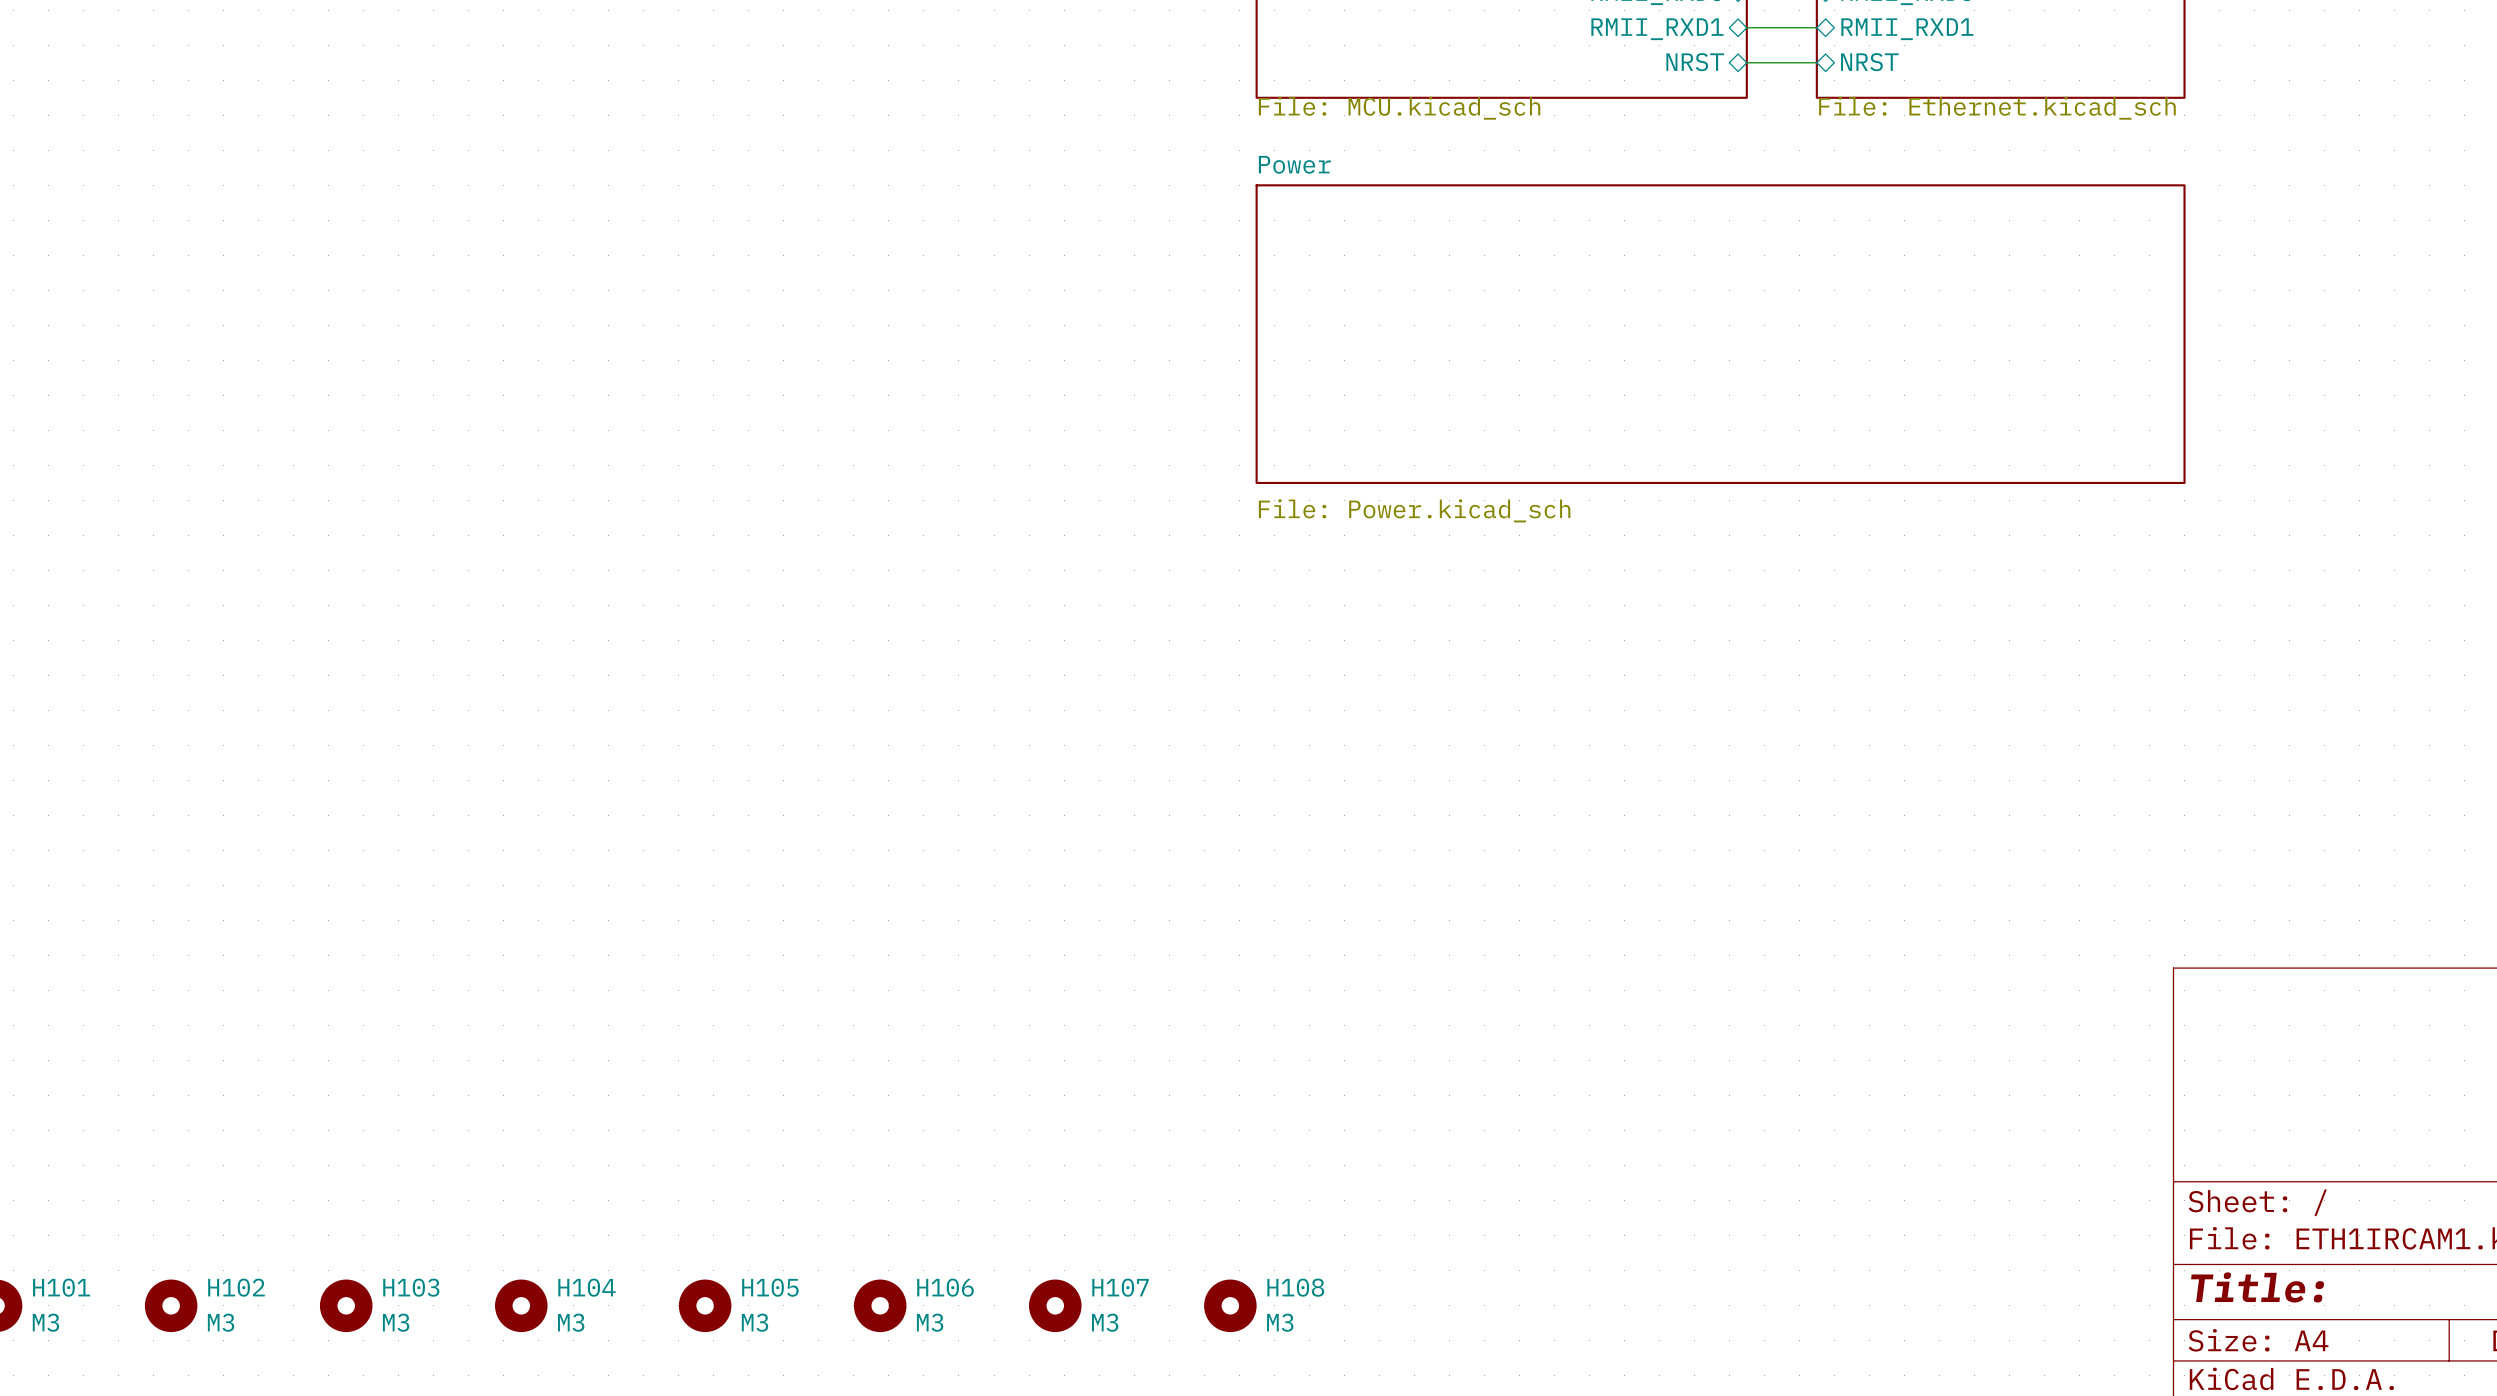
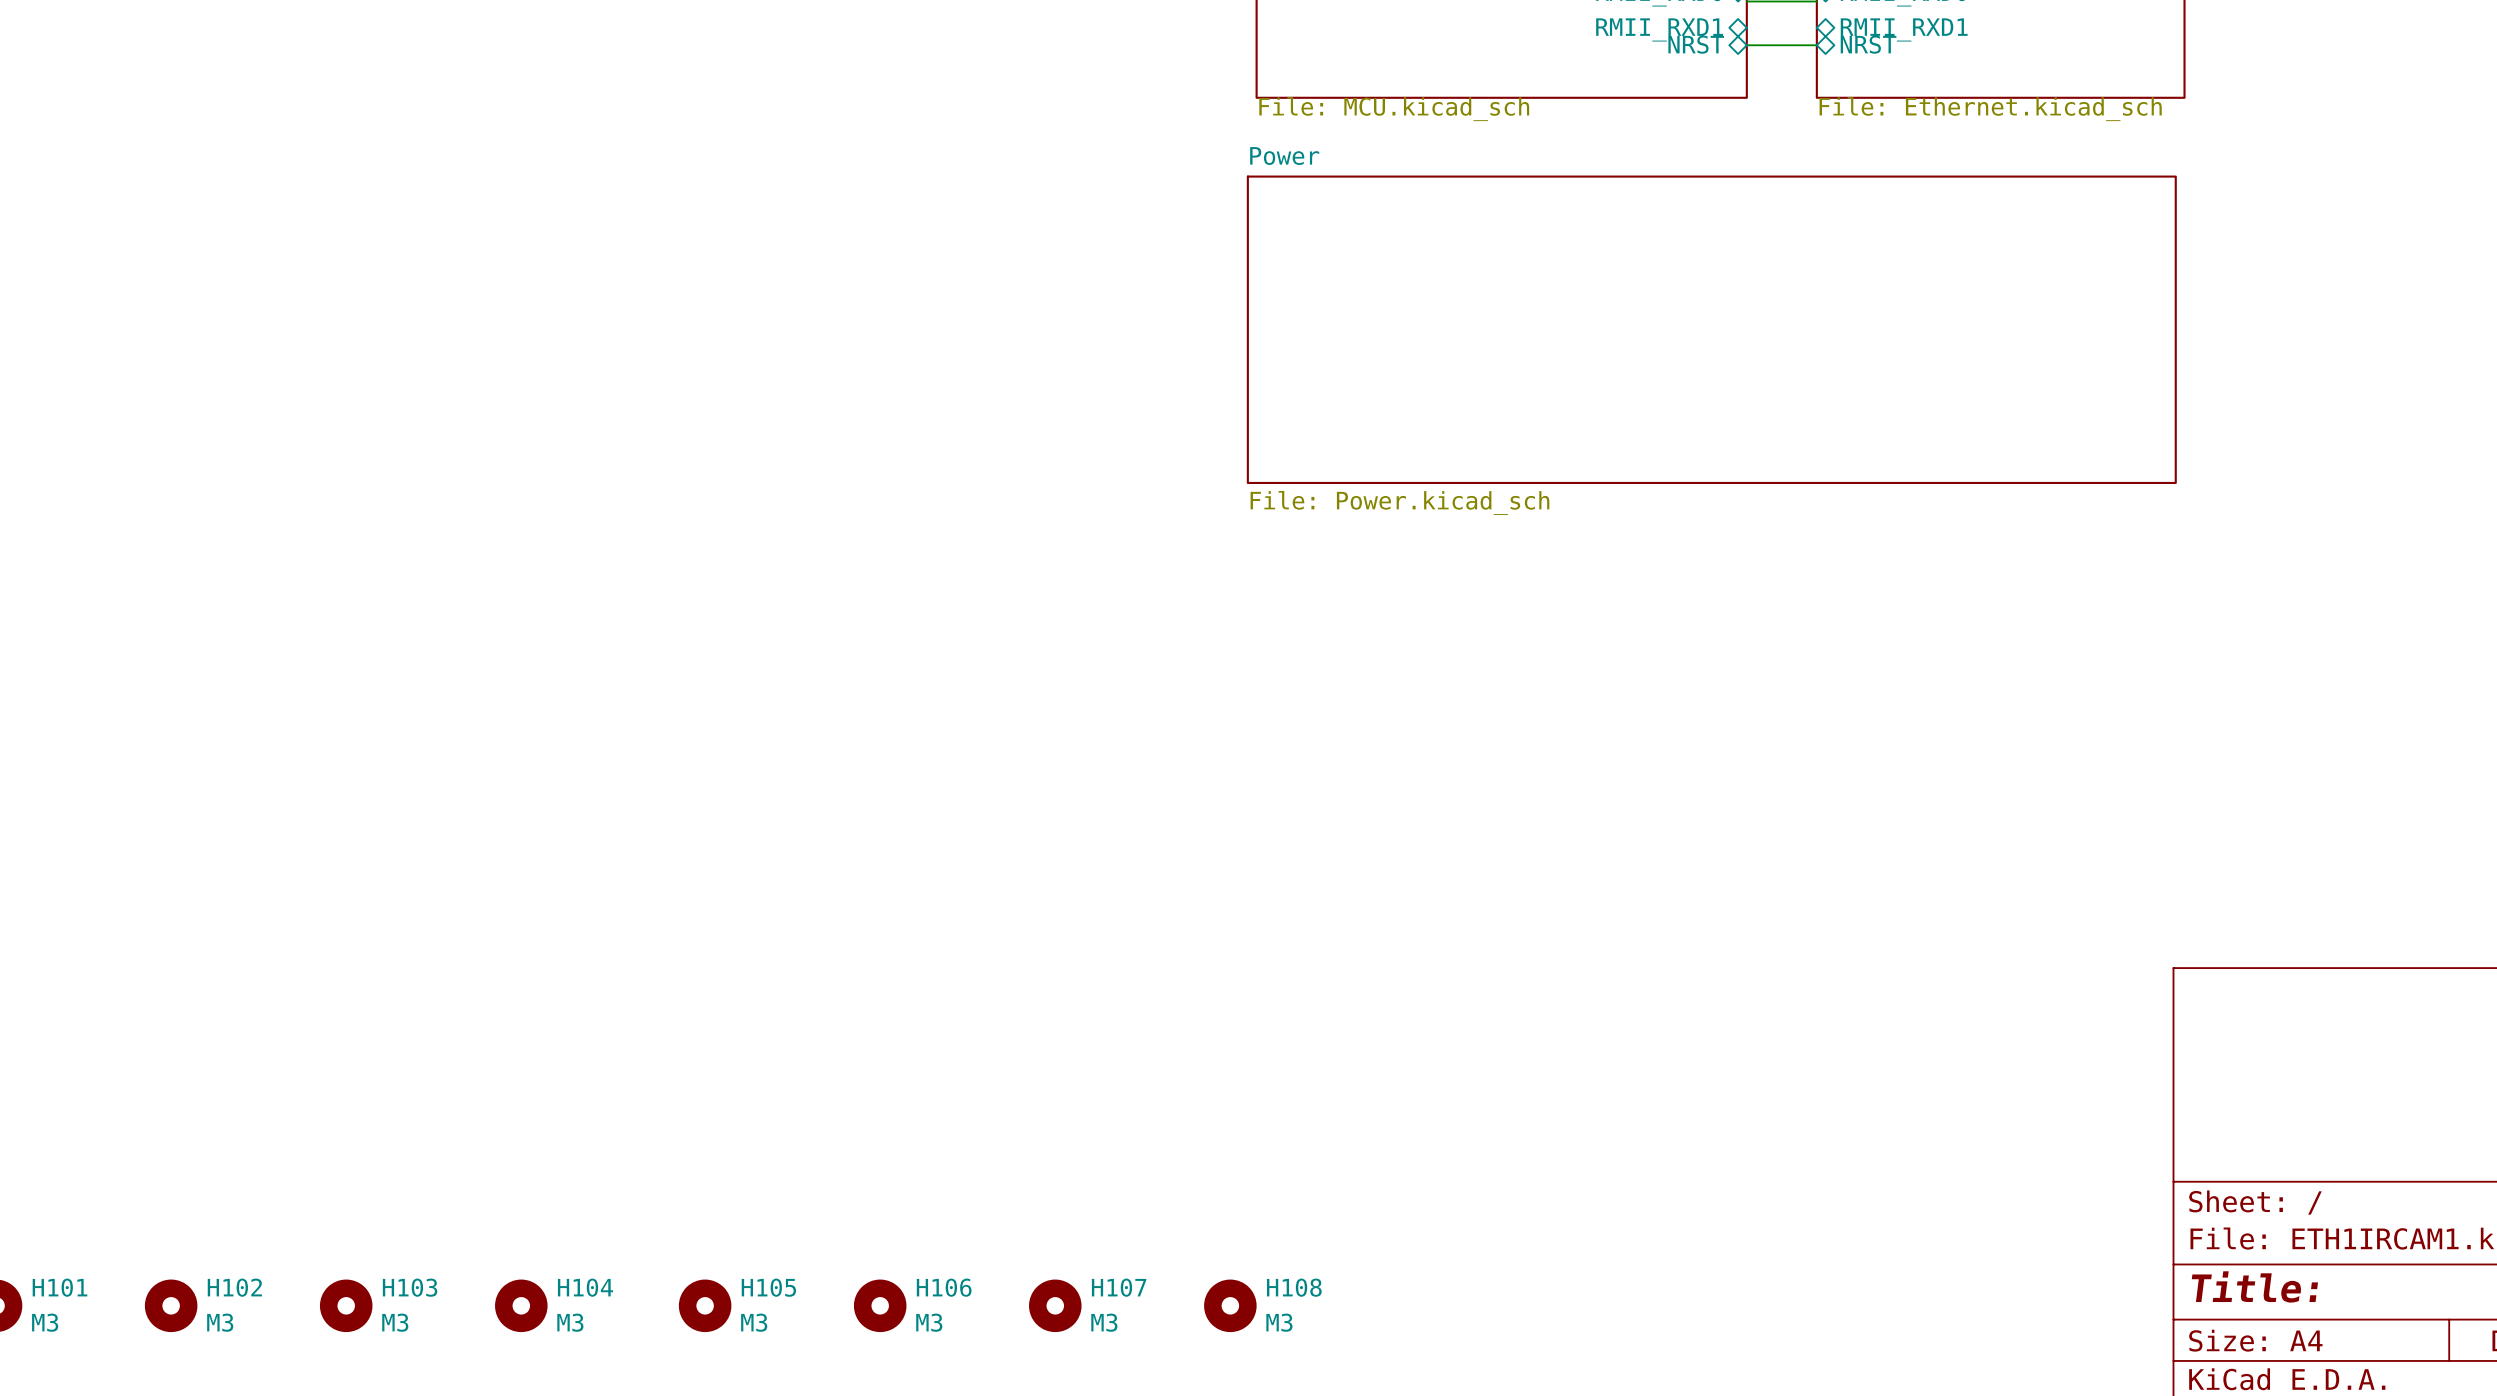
wire: (1746, 27) (1816, 27) -> (1746, 45) (1816, 45)
sheet pin position: NRST (1695, 62) -> NRST (1696, 44)
wire: (1746, 62) (1816, 62) -> (1746, 1) (1816, 1)
sheet pin position: NRST (1869, 62) -> NRST (1868, 44)
sheet Power name position: Power (1294, 164) -> Power (1284, 156)
sheet Power shape: [1255, 184, 2186, 485] -> [1246, 175, 2177, 485]
sheet Power value position: File: Power.kicad_sch (1414, 510) -> File: Power.kicad_sch (1399, 503)

